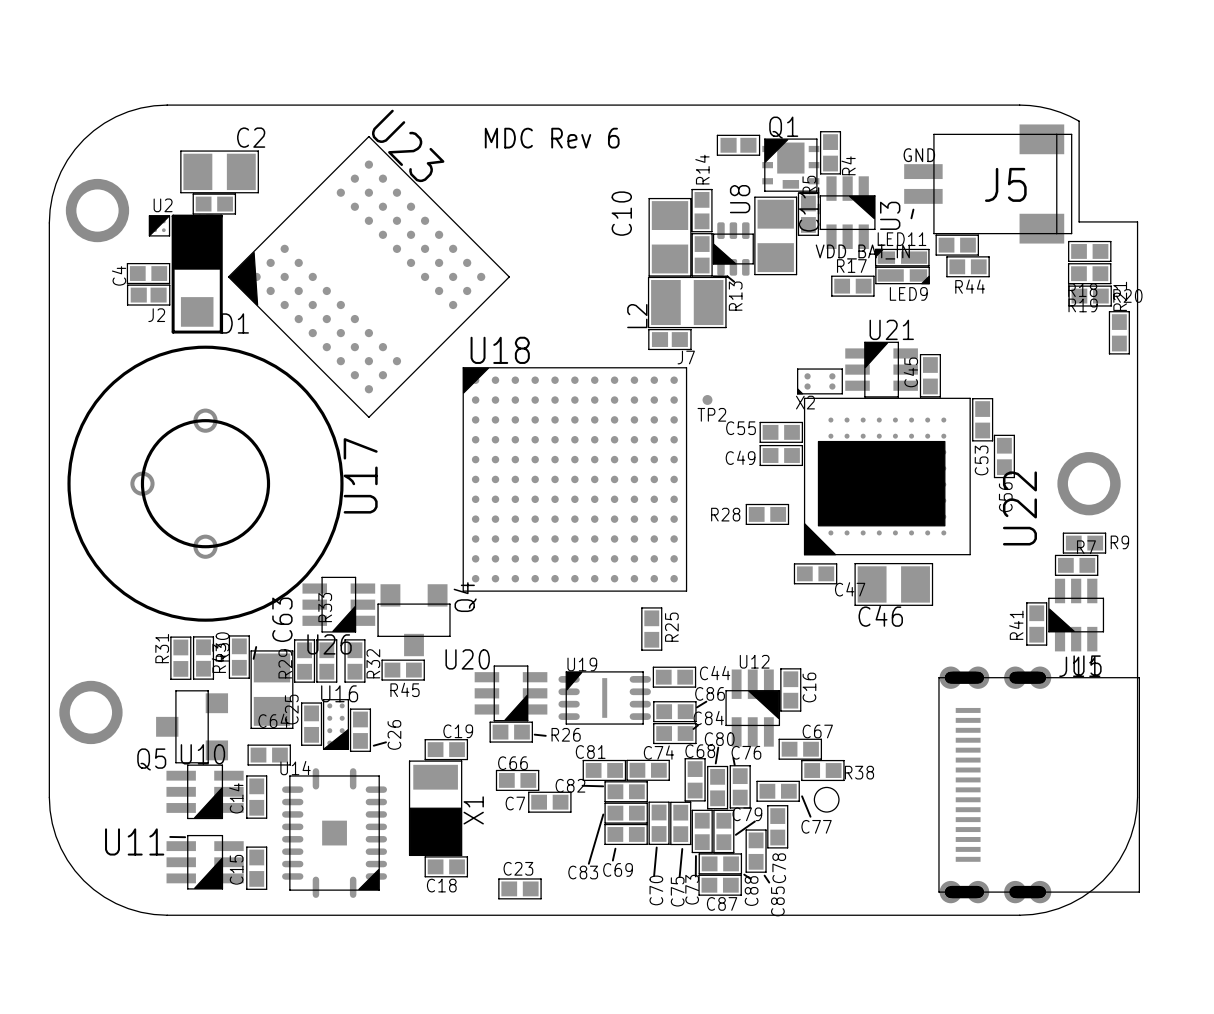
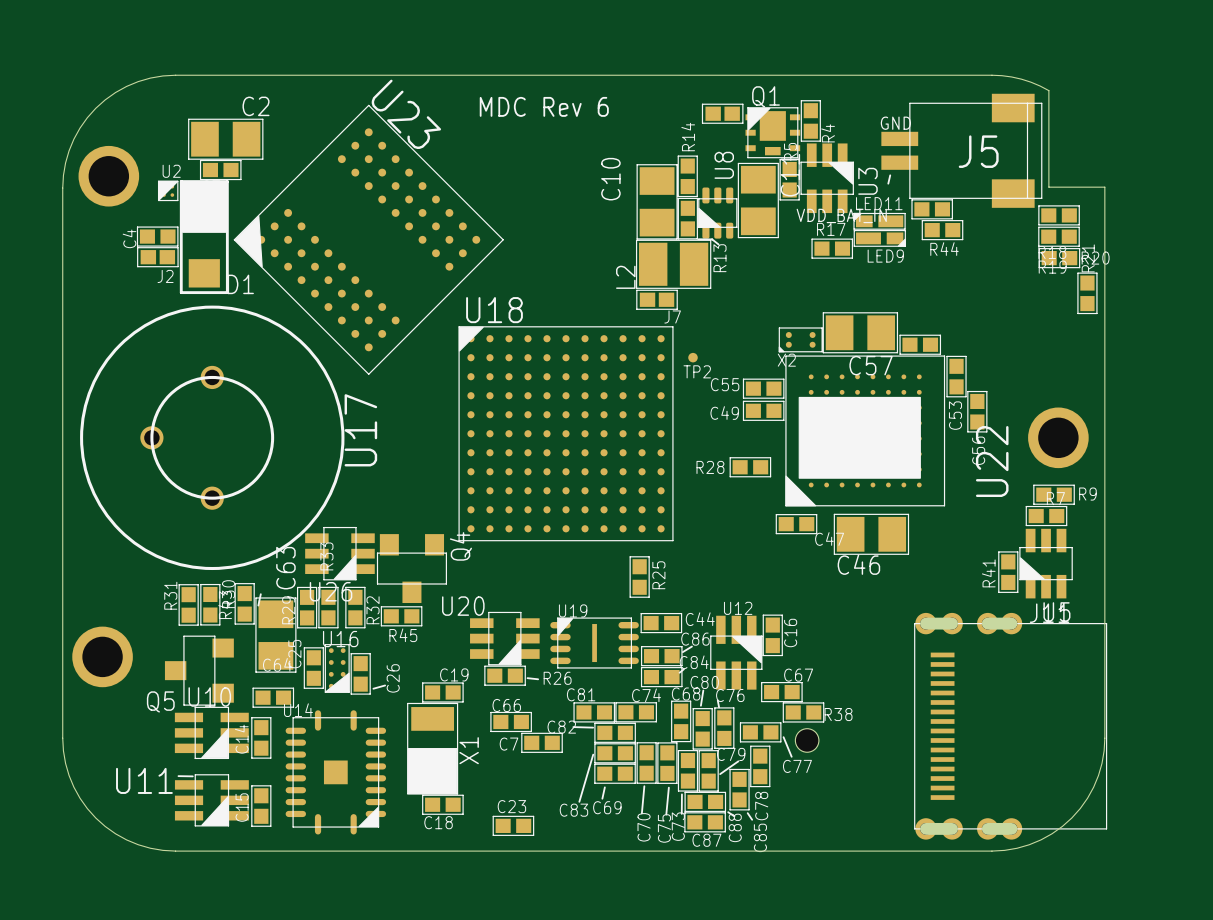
U21: (881, 369) -> none
C57: none -> (860, 332)
C45: (930, 375) -> none
part: none -> (920, 344)

